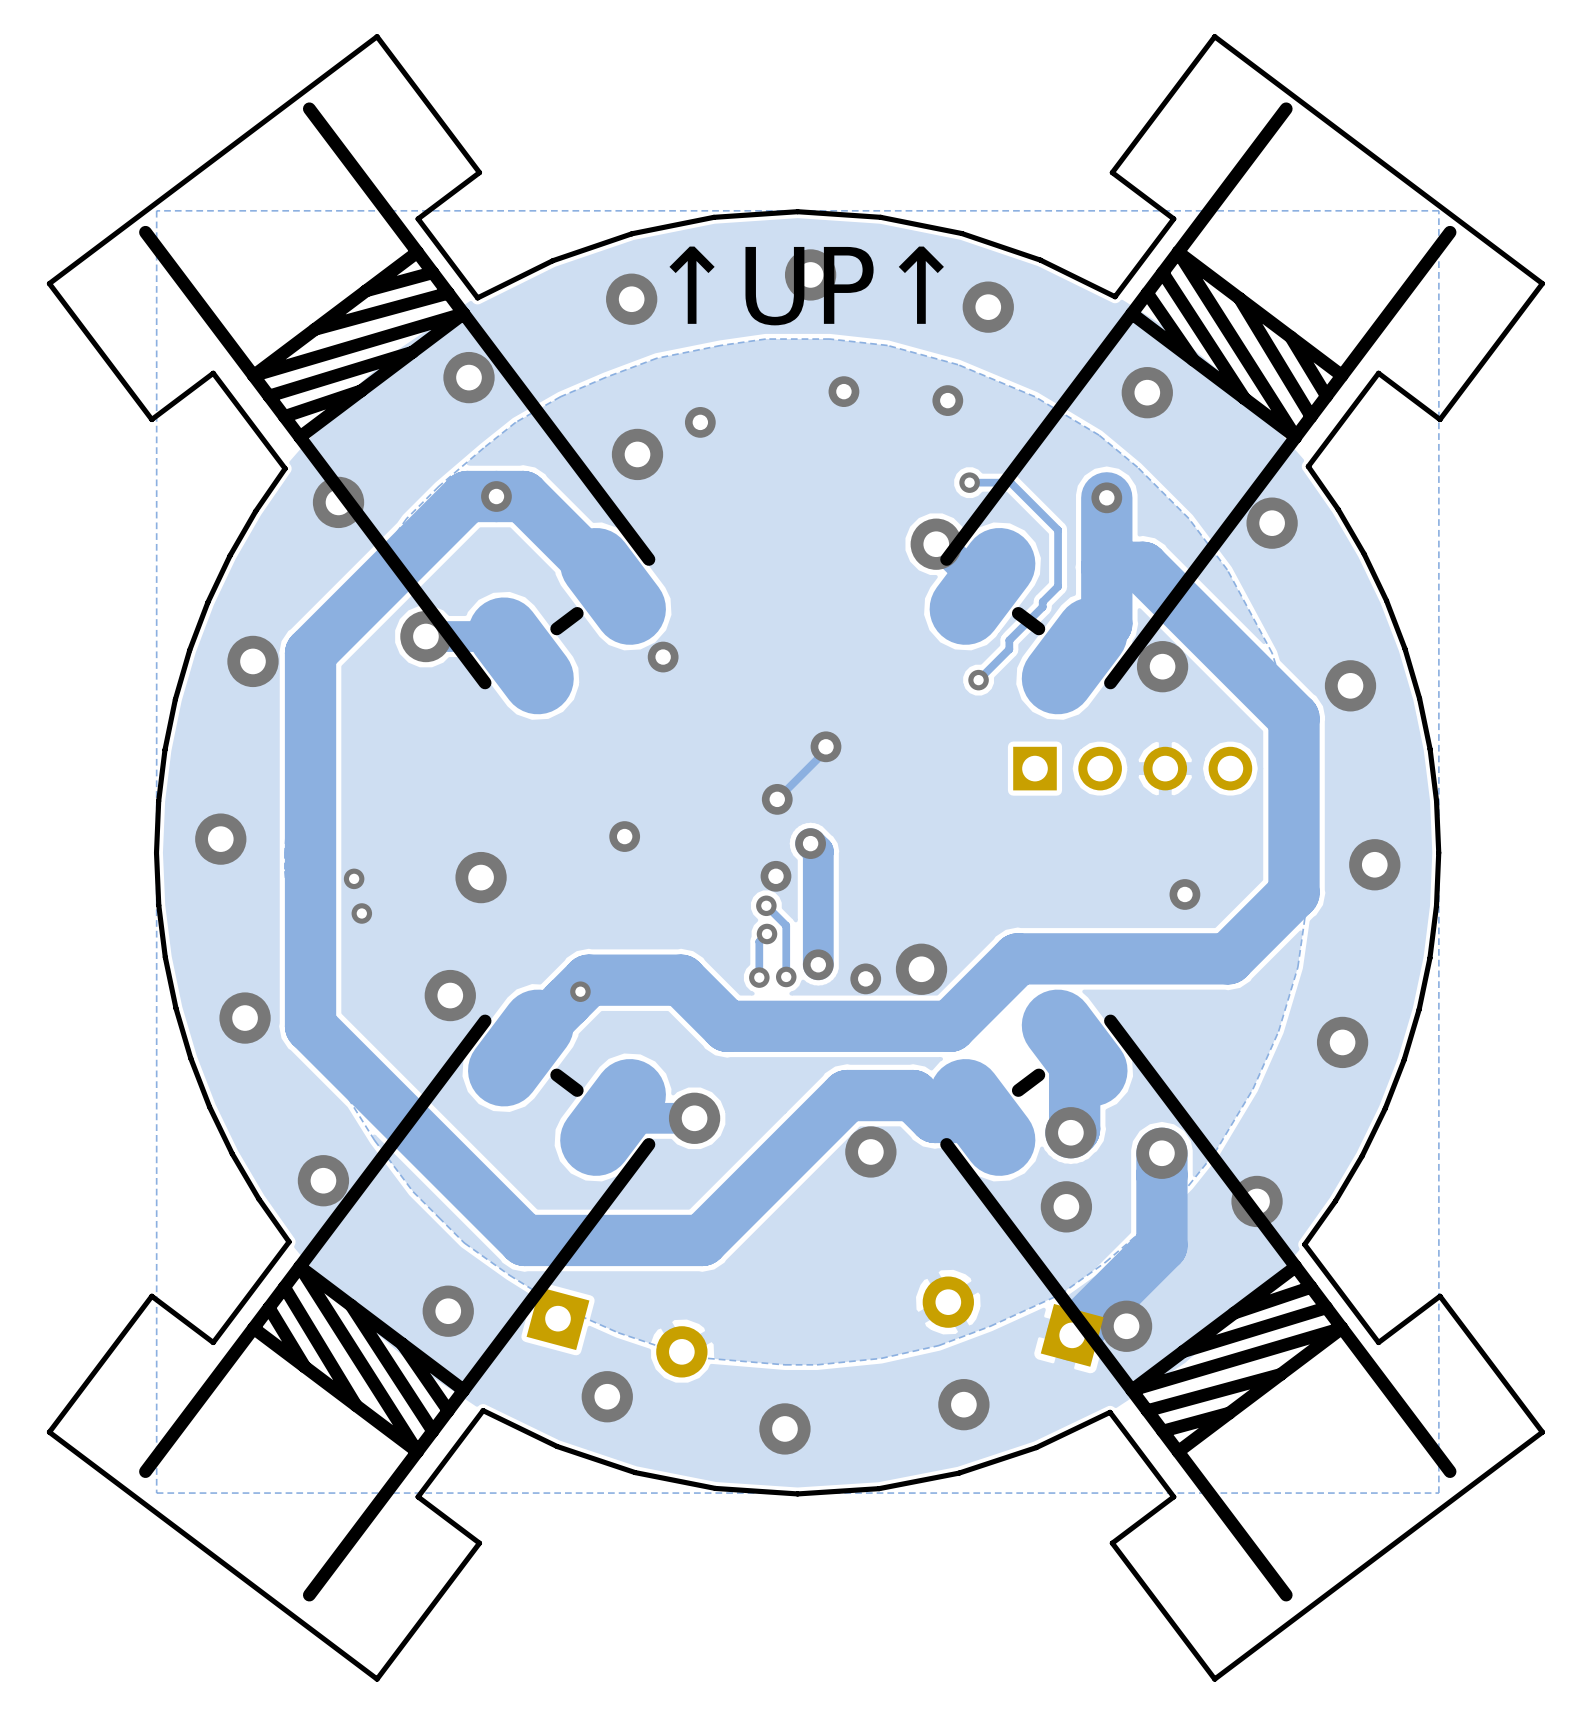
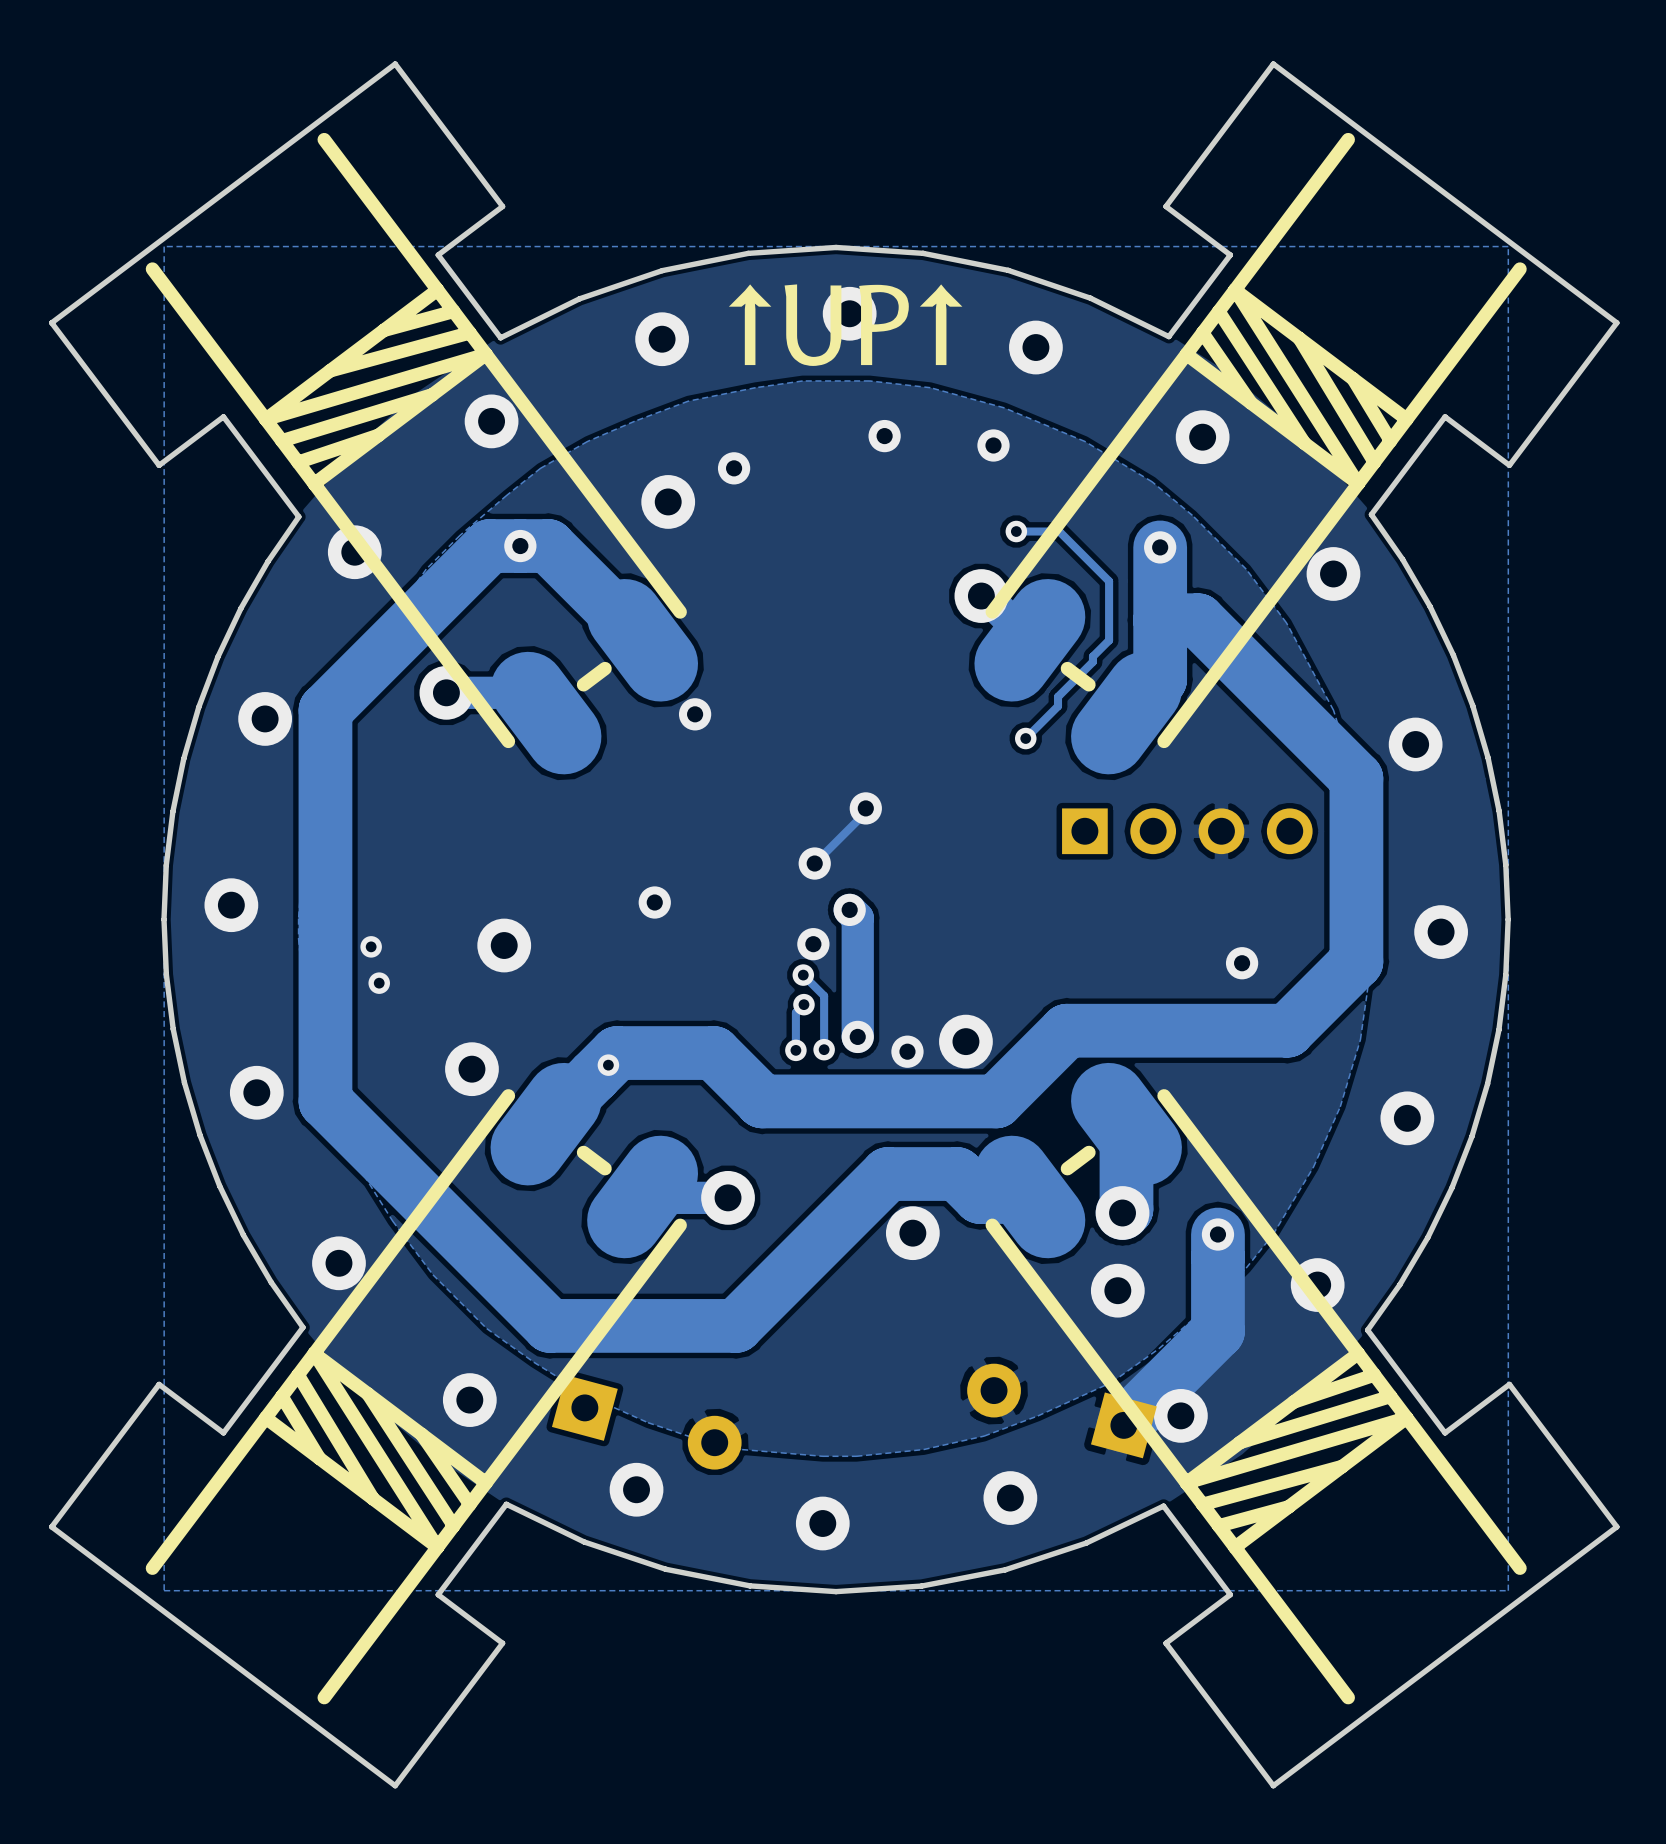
via: (1162, 666) -> none
via: (1161, 1153) -> none

